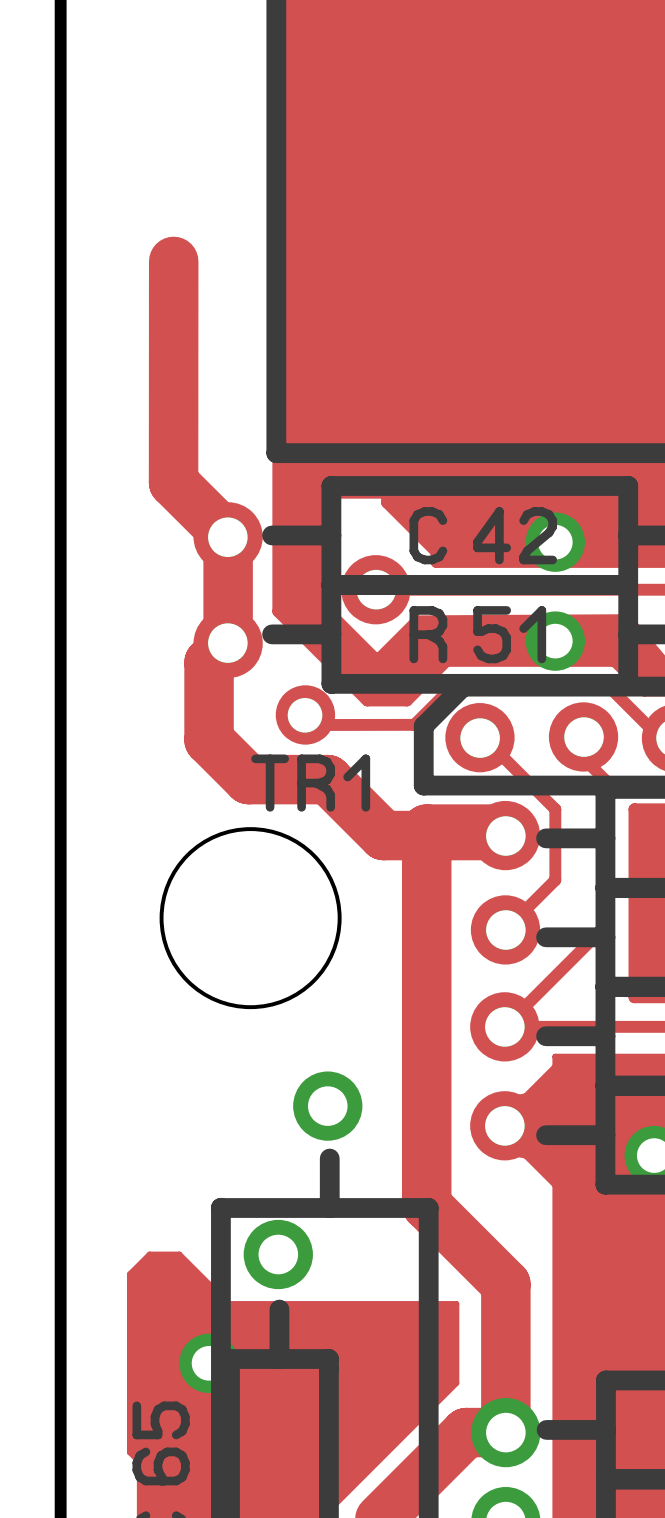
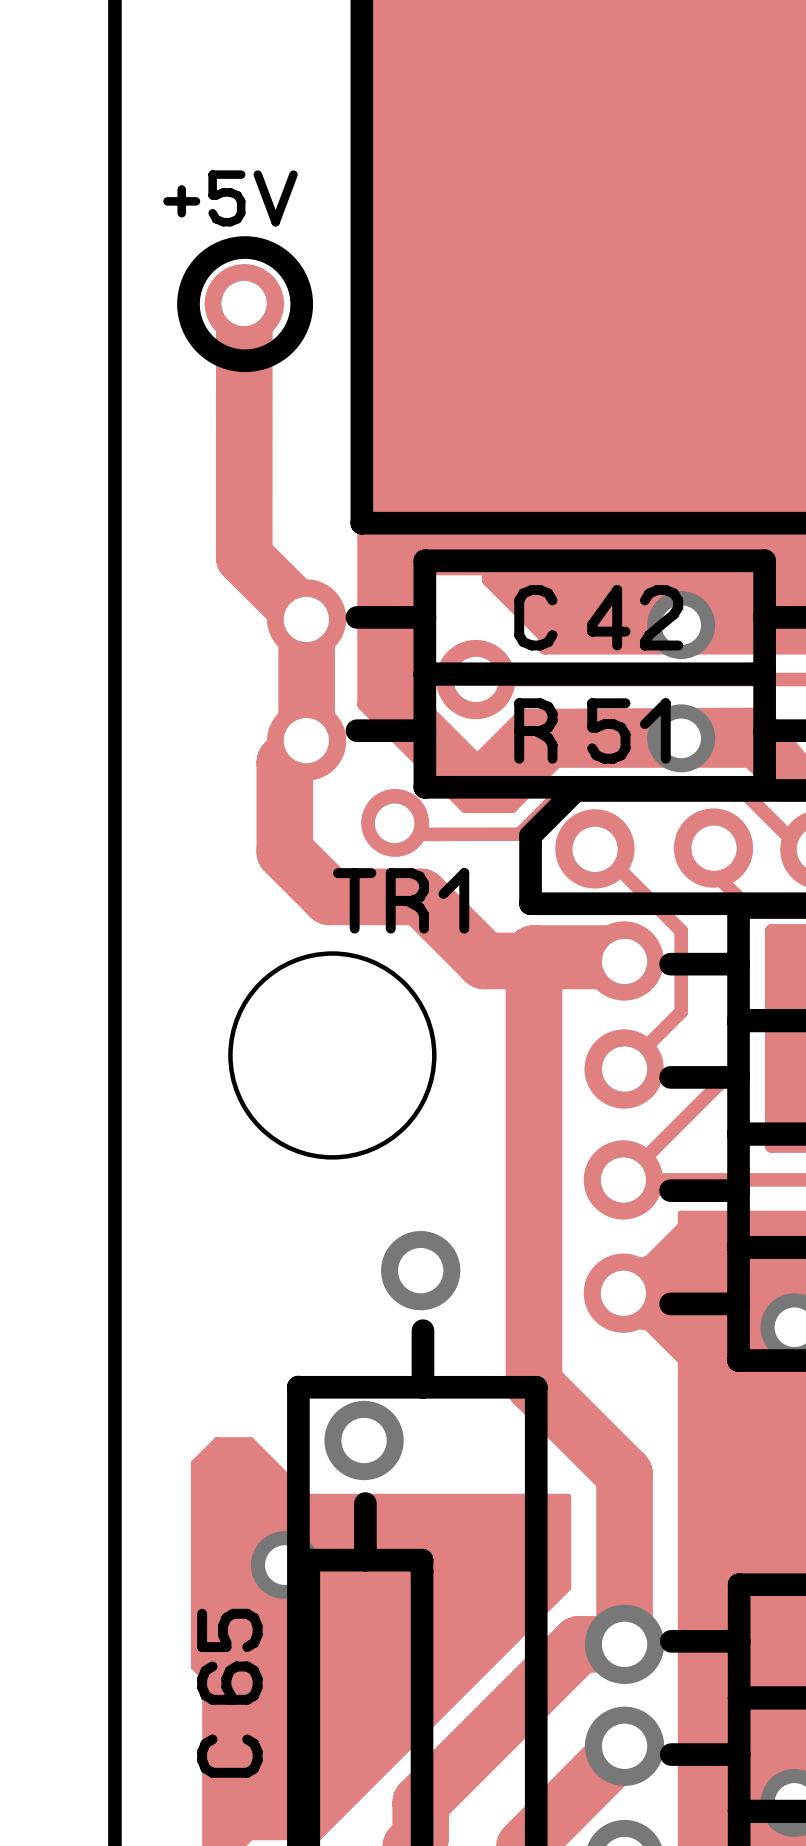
line: none -> (241, 174) (212, 174) (212, 195) (230, 192) (237, 195) (241, 201) (241, 213) (237, 219) (223, 222) (216, 219) (212, 213)
line: none -> (257, 174) (275, 222) (293, 174)
line: none -> (181, 189) (181, 213)
line: none -> (167, 201) (196, 201)
drawing: none -> [177, 236, 314, 373]
via: none -> (244, 303)

